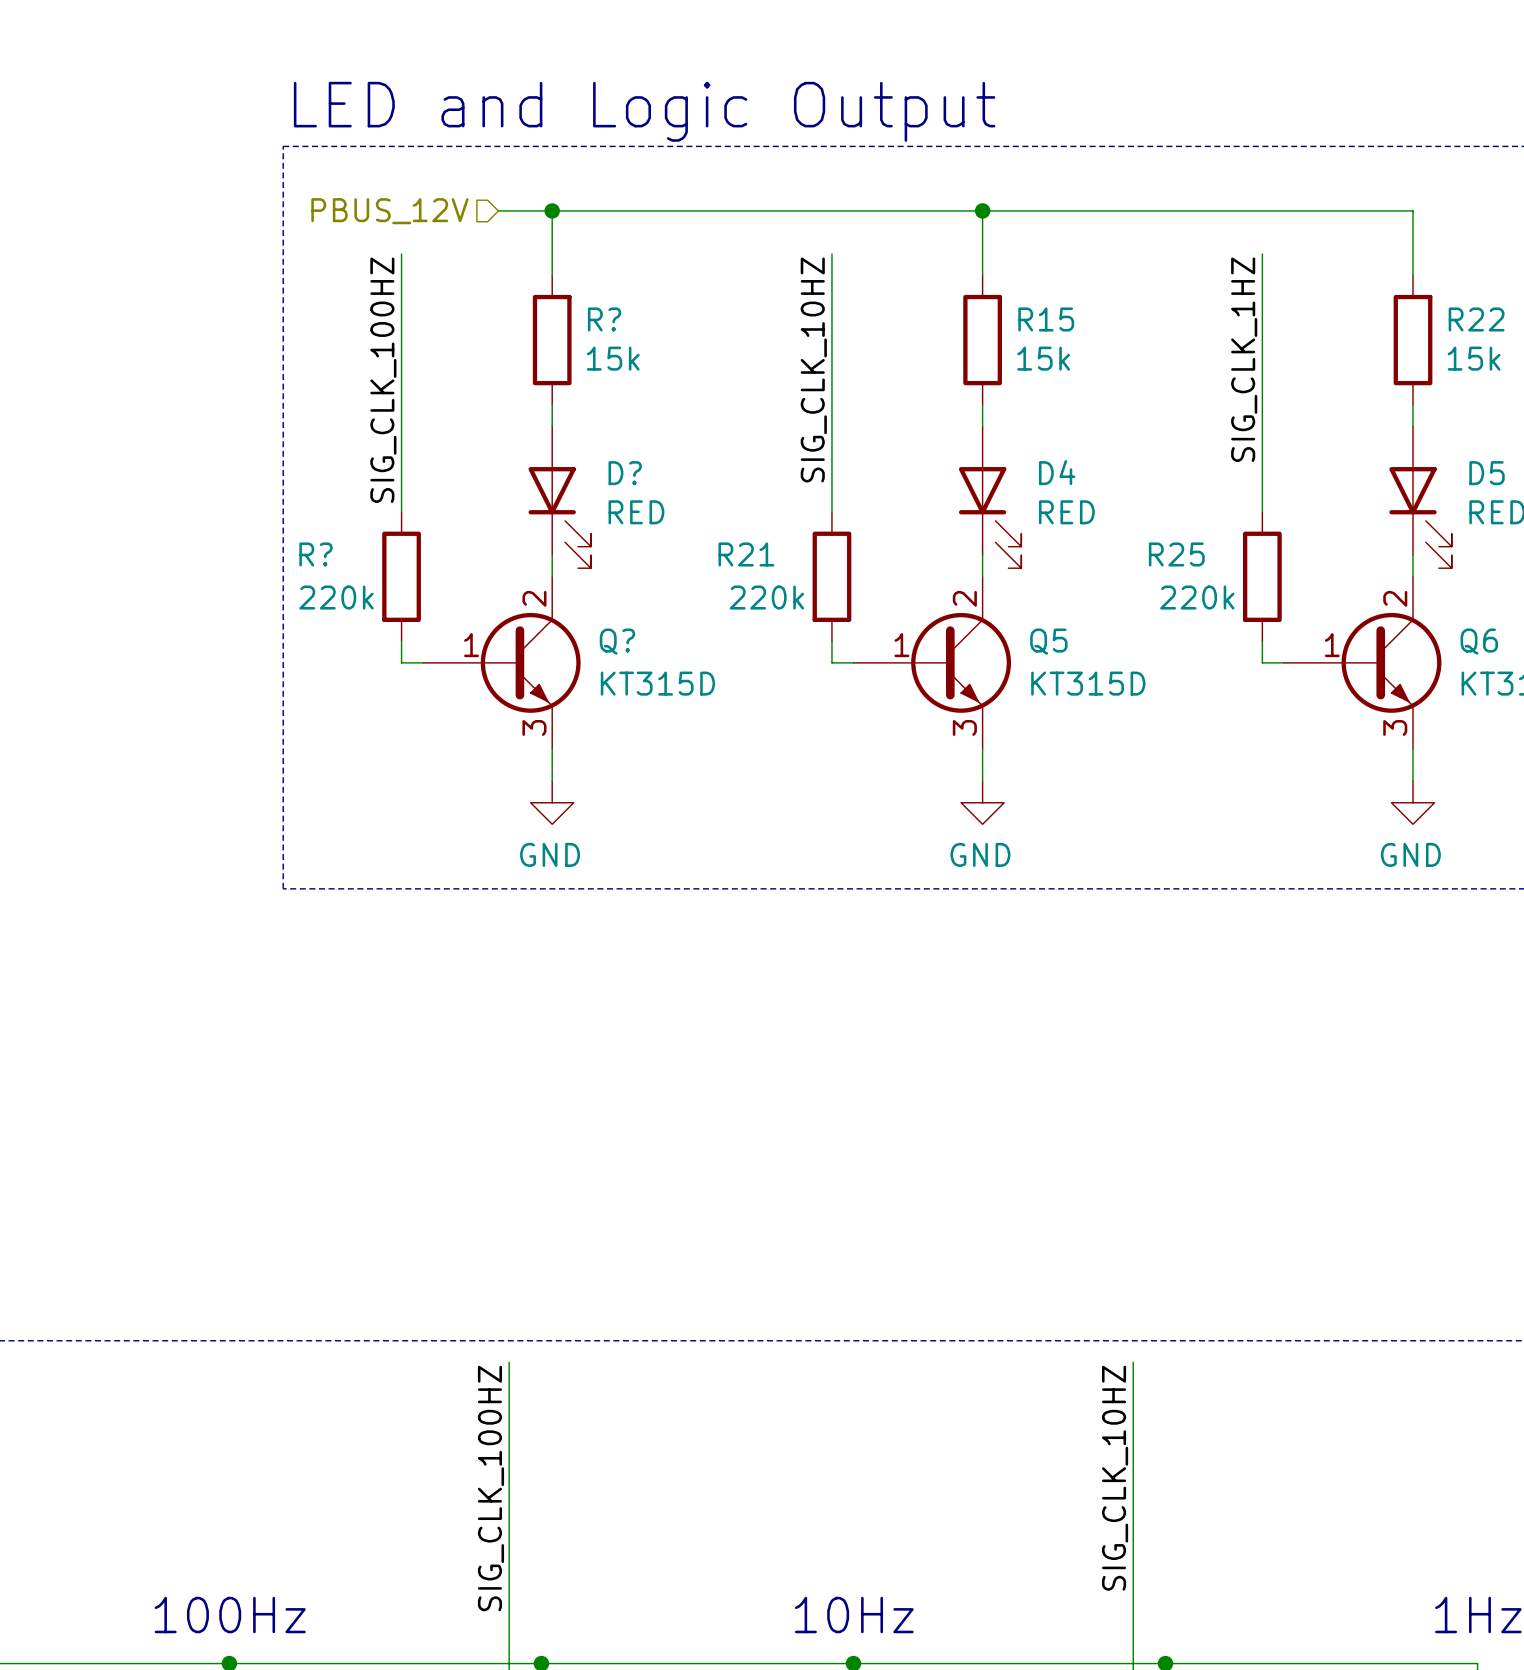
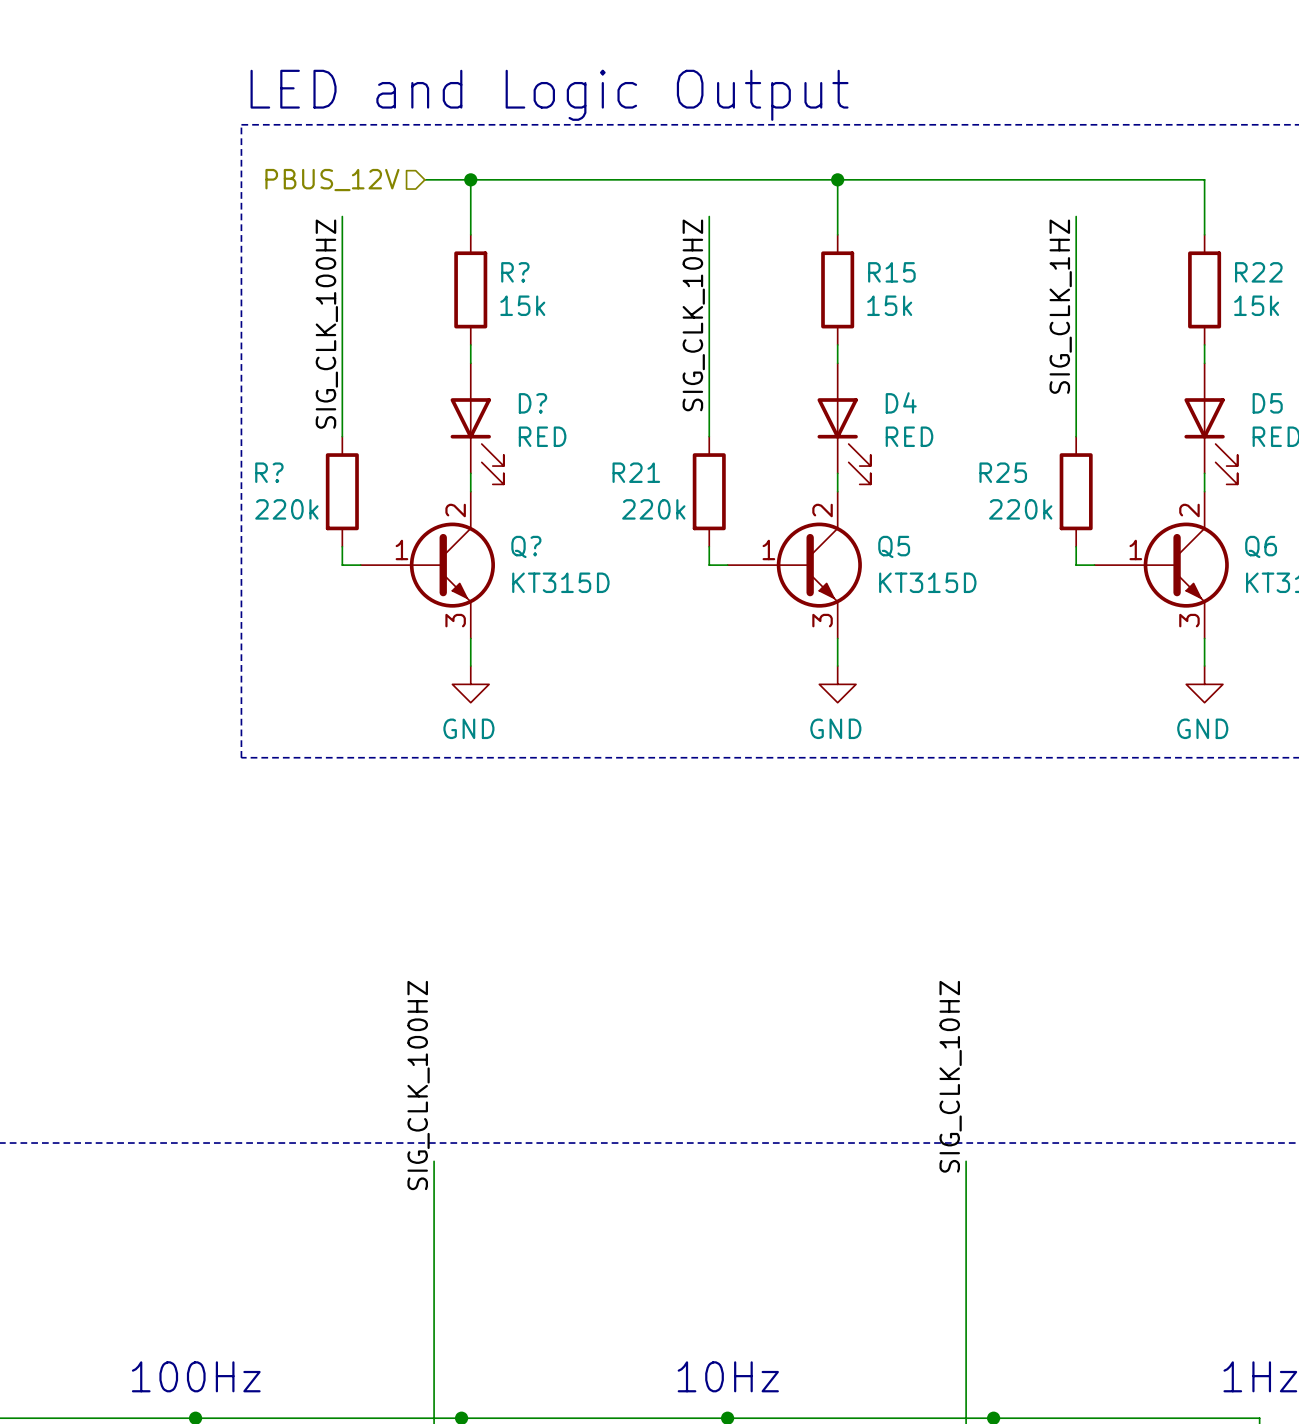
label position: SIG_CLK_10HZ (1115, 1478) -> SIG_CLK_10HZ (950, 1076)
label position: SIG_CLK_100HZ (490, 1488) -> SIG_CLK_100HZ (418, 1085)

